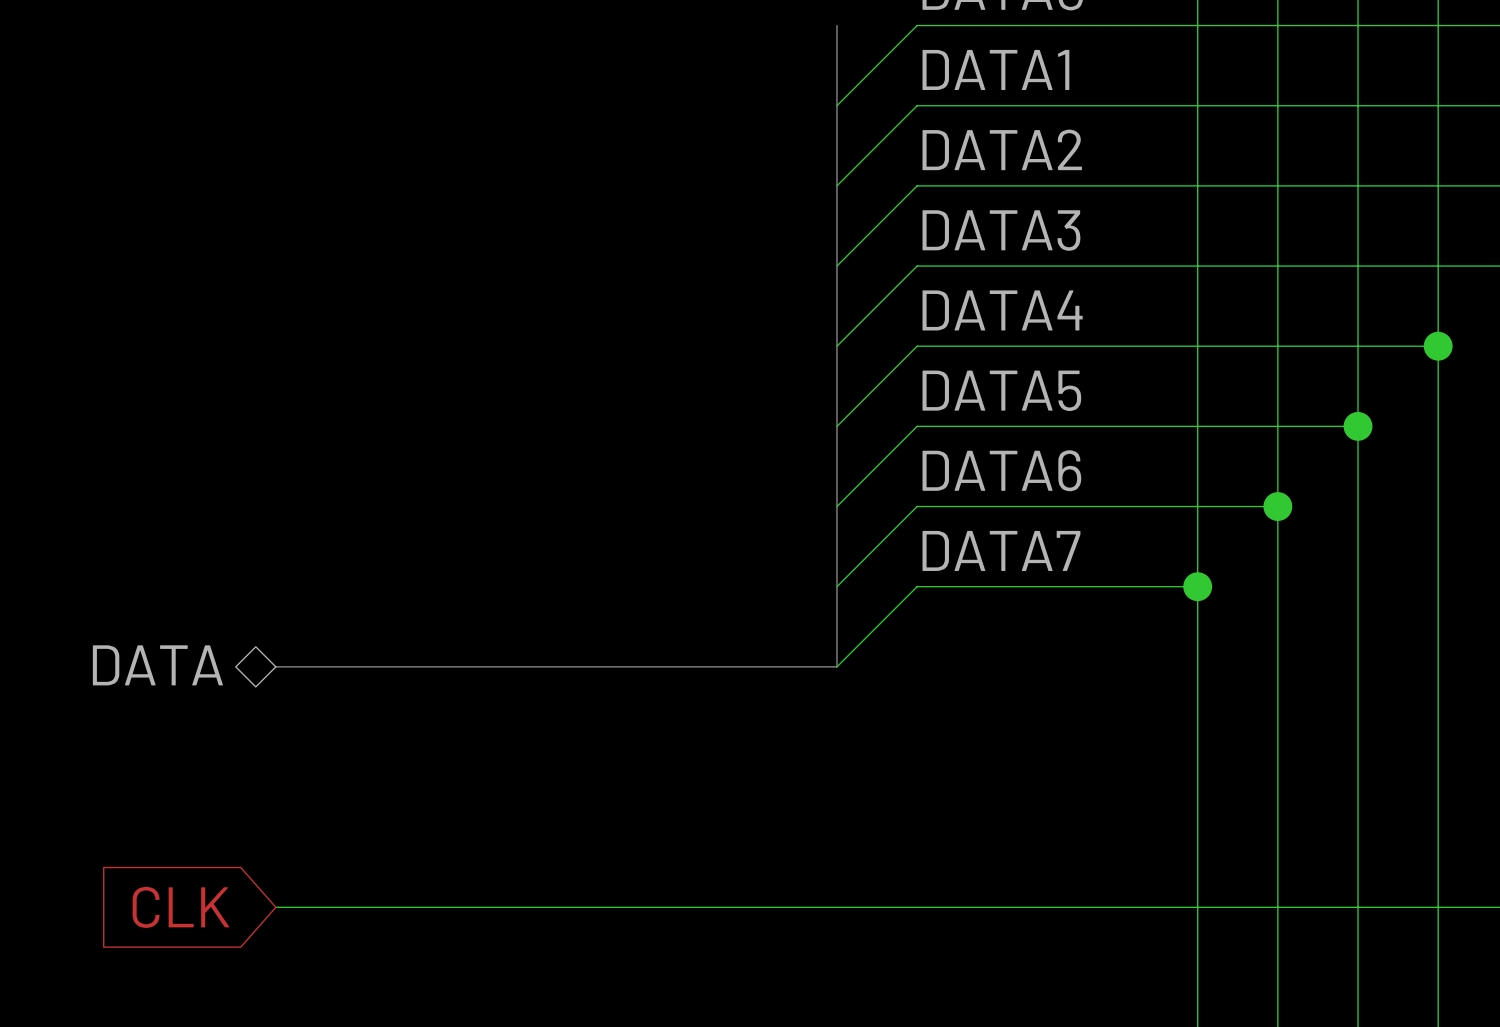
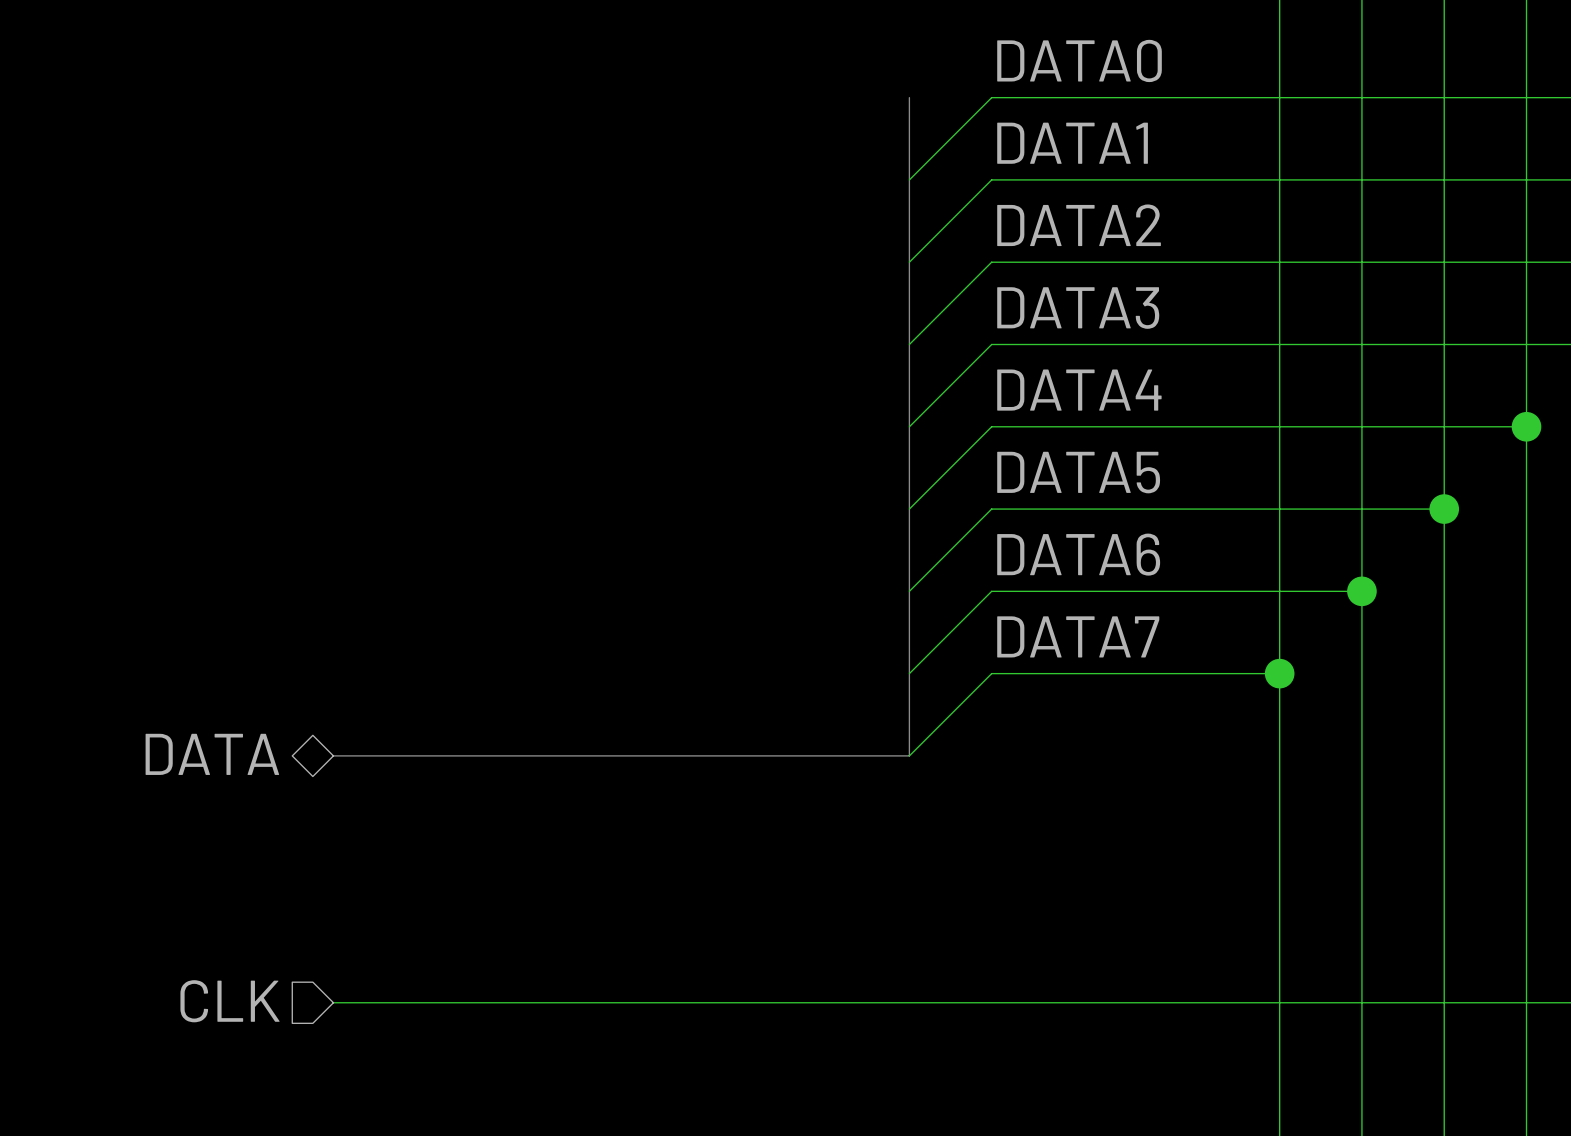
hierarchical label: none -> CLK (230, 1001)
global label: CLK (180, 907) -> none

